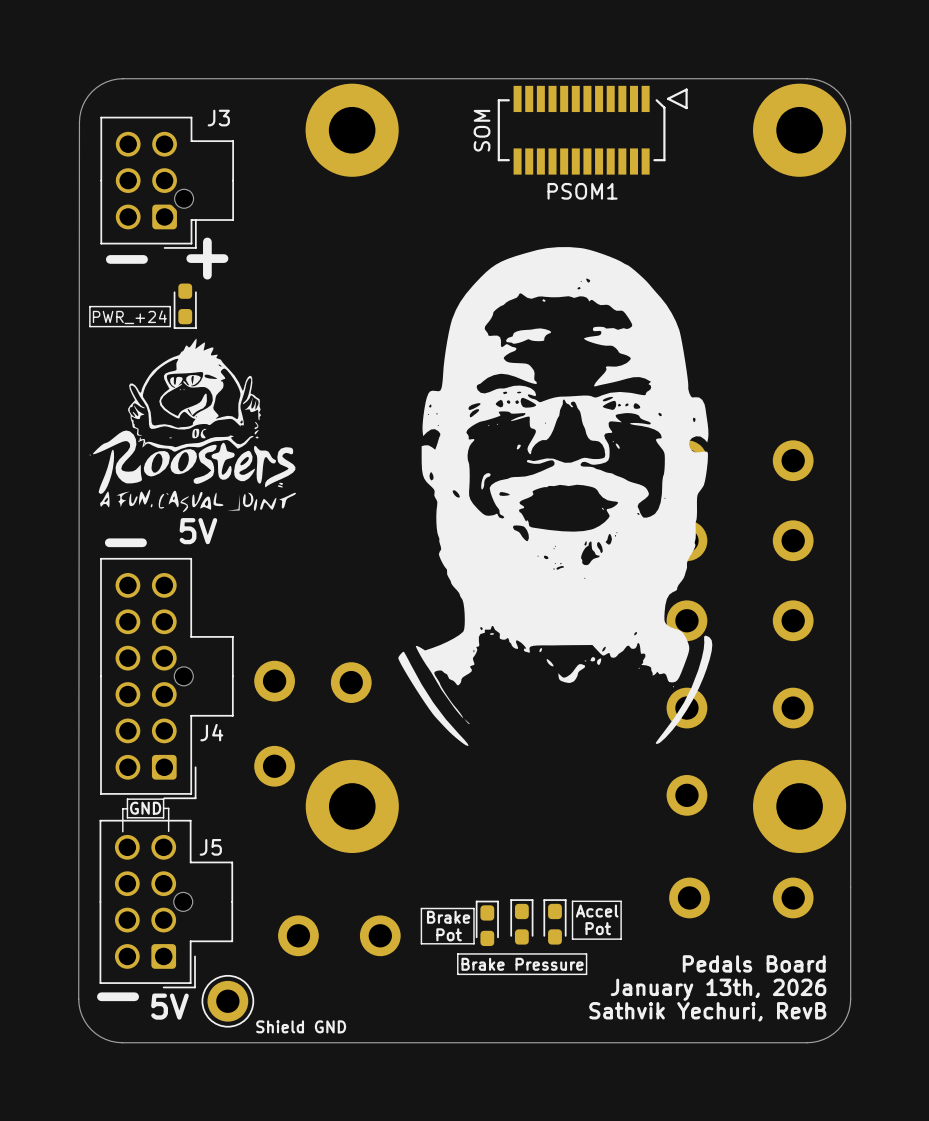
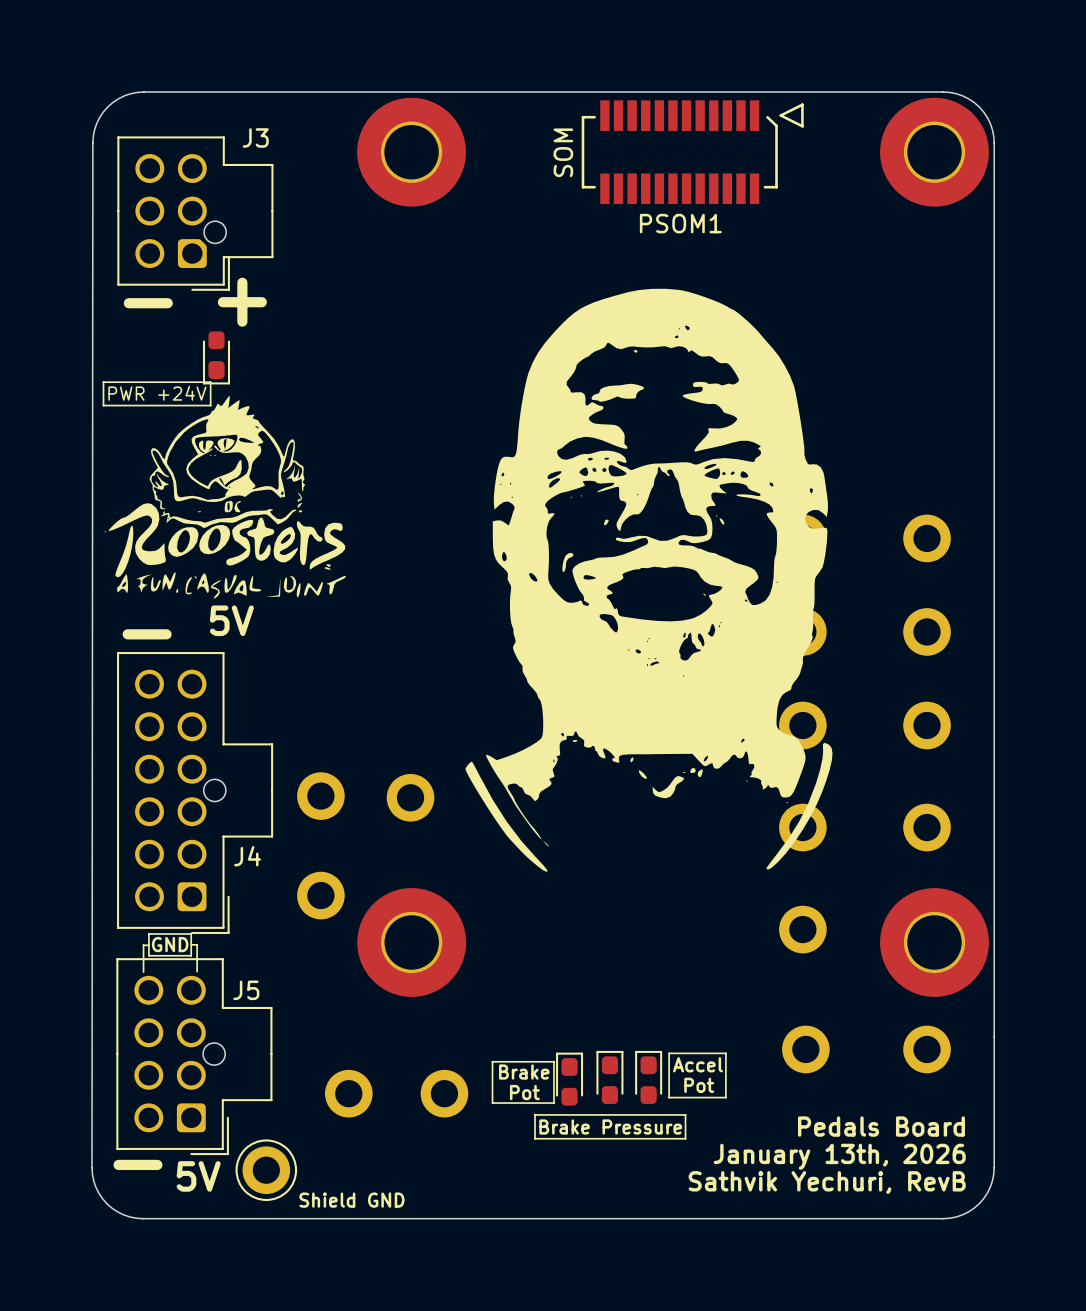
line: (89, 306) (170, 306) (170, 326) (89, 326) (89, 306) -> none
PWR_+24 name: PWR_+24 (129, 317) -> none
line: none -> (103, 382) (210, 382) (210, 405) (103, 405) (103, 382)
text: none -> PWR +24V (157, 393)

